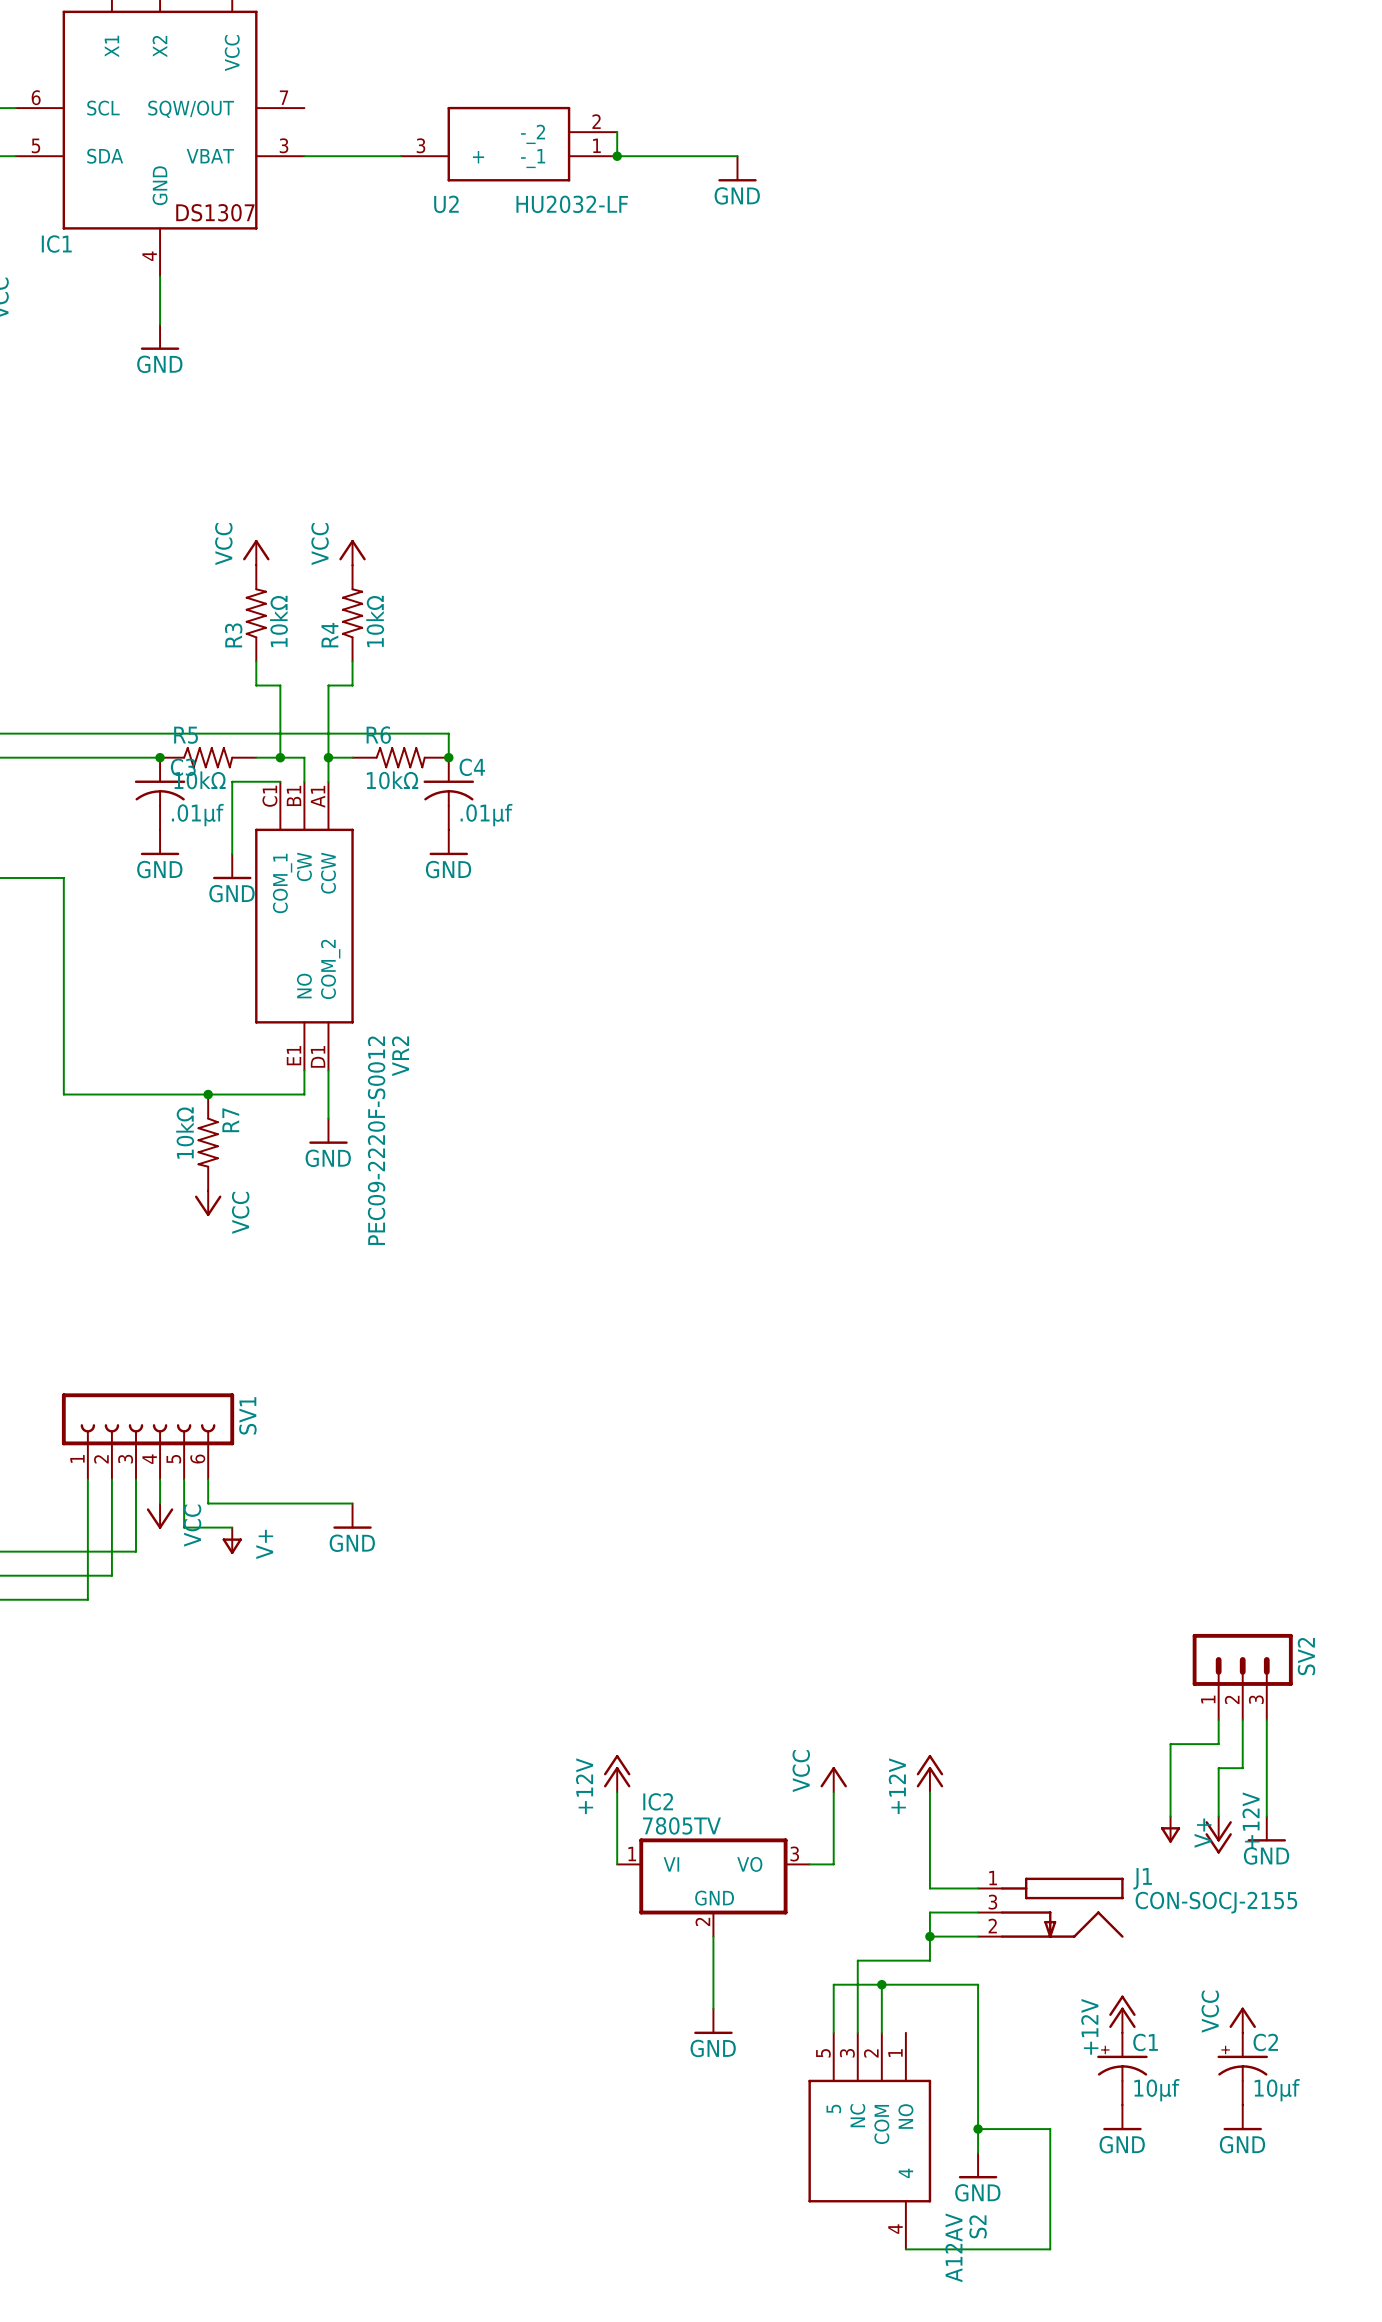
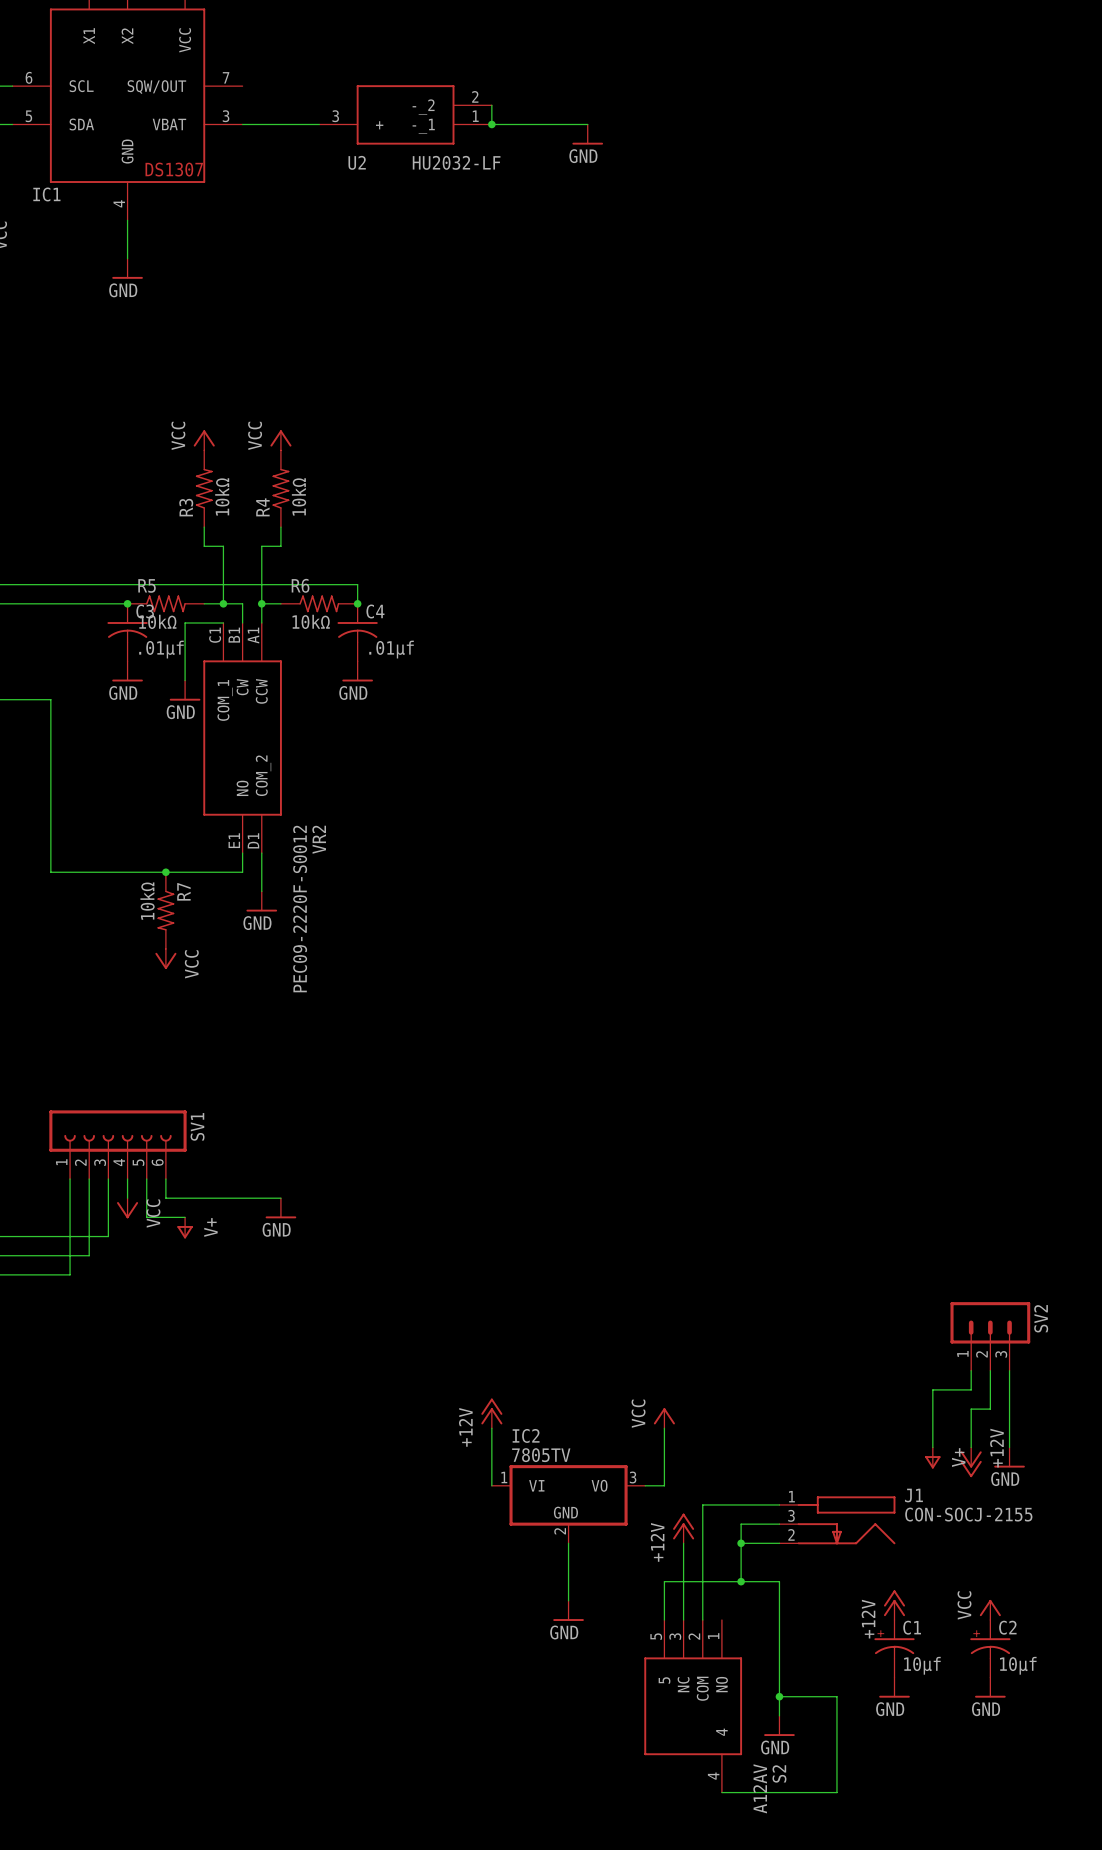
power symbol position: +12V (929, 1773) -> +12V (683, 1528)
wire: (929, 1792) (929, 1888) -> (702, 1581) (702, 1504) (741, 1504)
wire: (857, 1960) (929, 1960) -> (683, 1562) (683, 1543)
wire: none -> (741, 1562) (741, 1581)
junction position: (881, 1984) -> (741, 1581)

